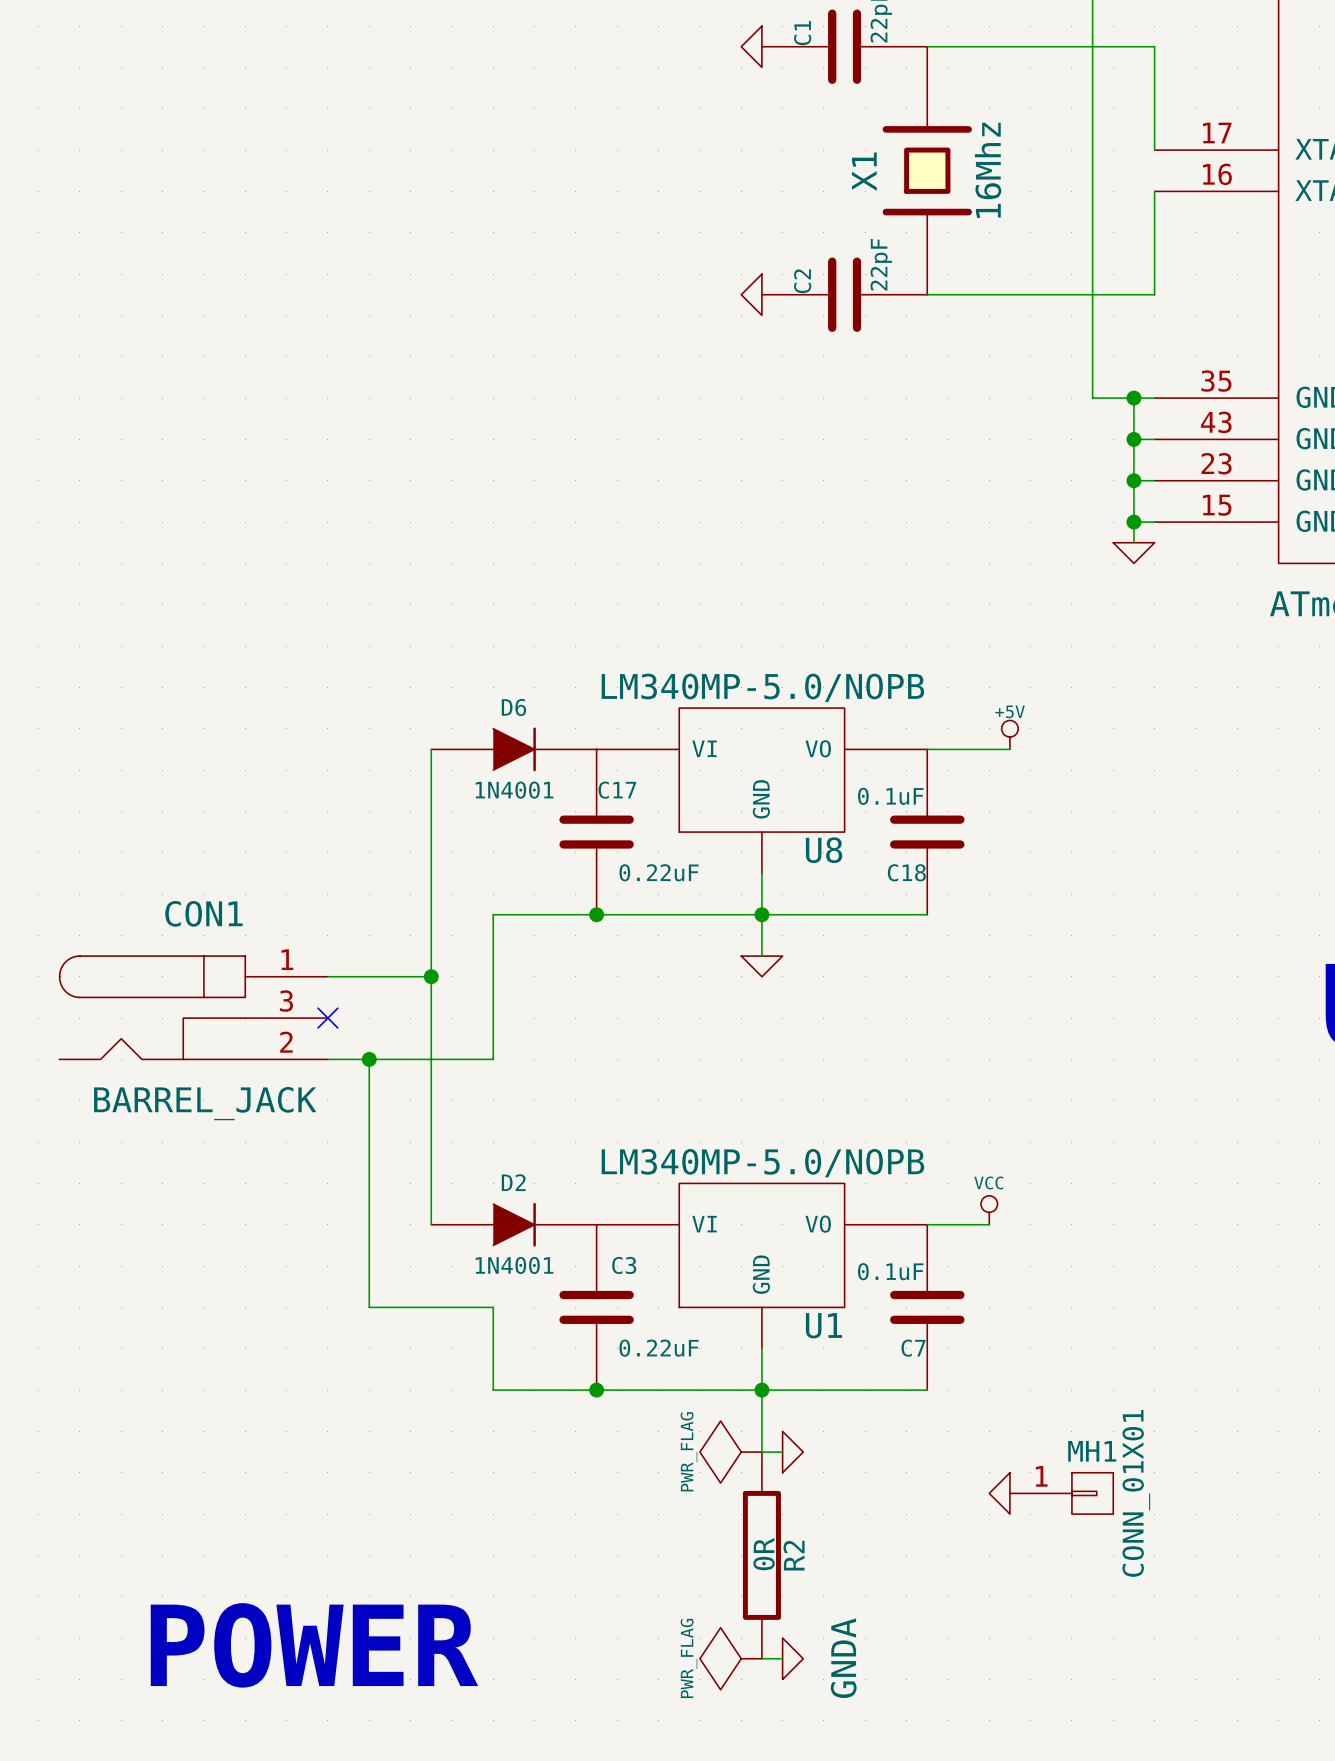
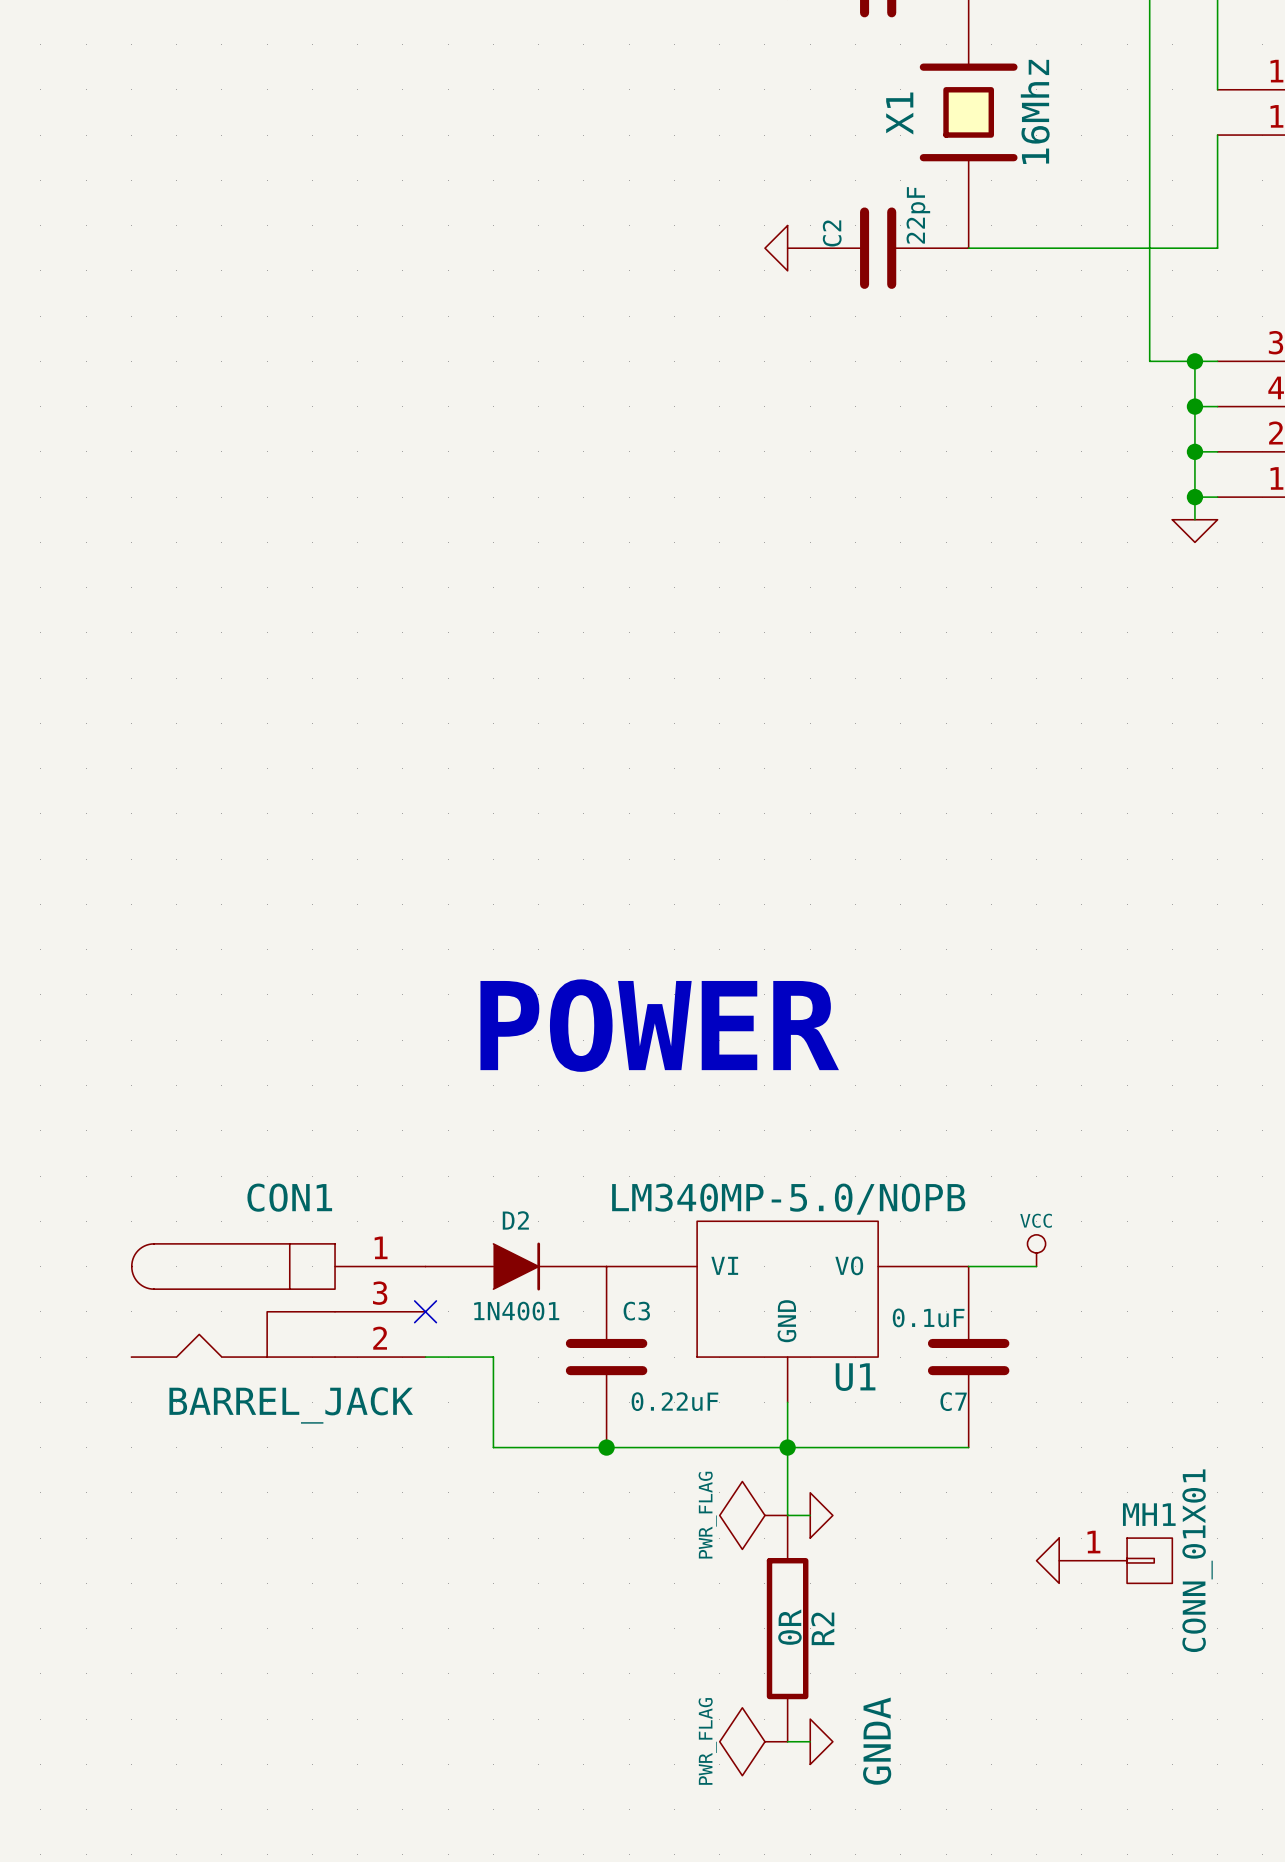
power symbol: +5V (1009, 734) -> none
wire: (431, 749) (431, 1224) -> none
D6: 1N4001 (513, 749) -> none
wire: (927, 749) (1009, 749) -> none
U8: LM340MP-5.0/NOPB (761, 790) -> none
C17: 0.22uF (596, 832) -> none
C18: 0.1uF (927, 832) -> none
wire: (761, 873) (761, 956) -> none
junction: (596, 914) -> none
junction: (761, 914) -> none
wire: (927, 914) (493, 914) (493, 1059) (327, 1059) -> none
power symbol: (761, 966) -> none
wire: (327, 976) (431, 976) -> none
junction: (431, 976) -> none
text: none -> POWER (659, 1025)
CON1 position: (193, 1007) -> (278, 1300)
no-connect mark: (327, 1018) -> none
wire: (369, 1059) (369, 1307) (431, 1307) -> none
junction: (369, 1059) -> none
no-connect mark: none -> (425, 1311)
text: POWER (314, 1645) -> none

